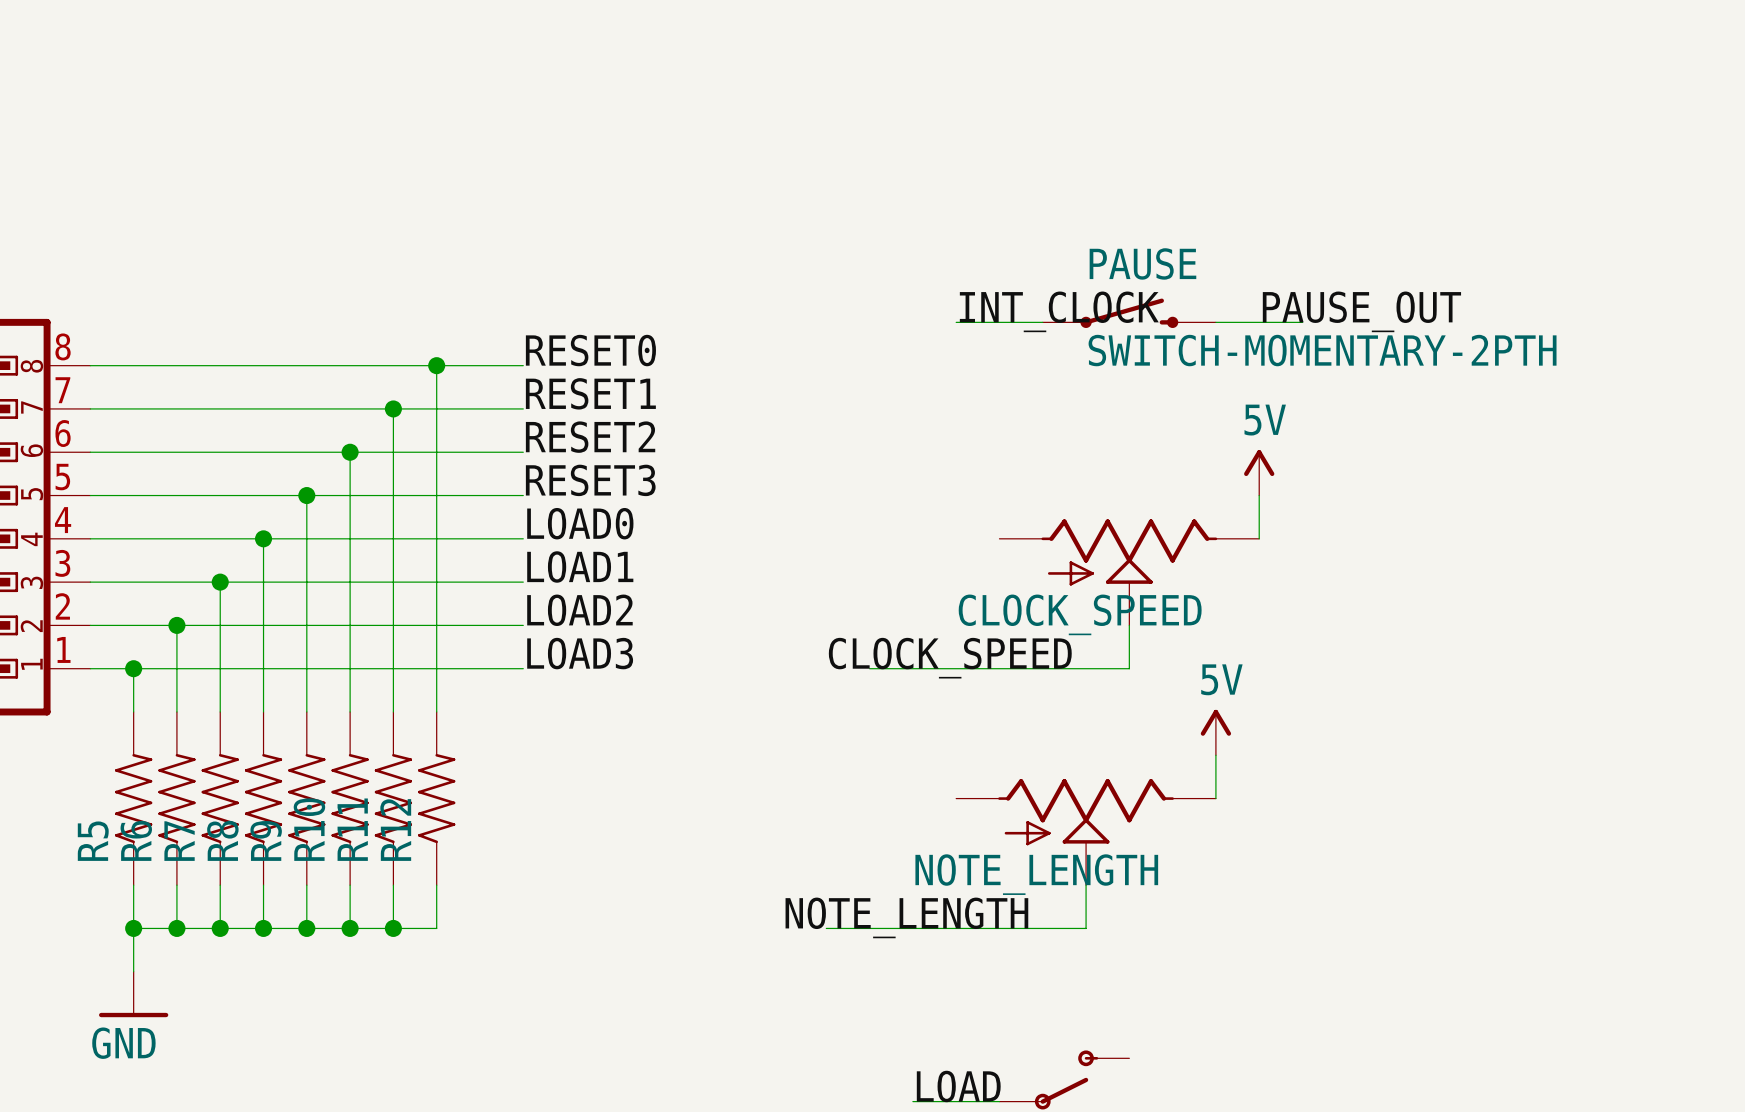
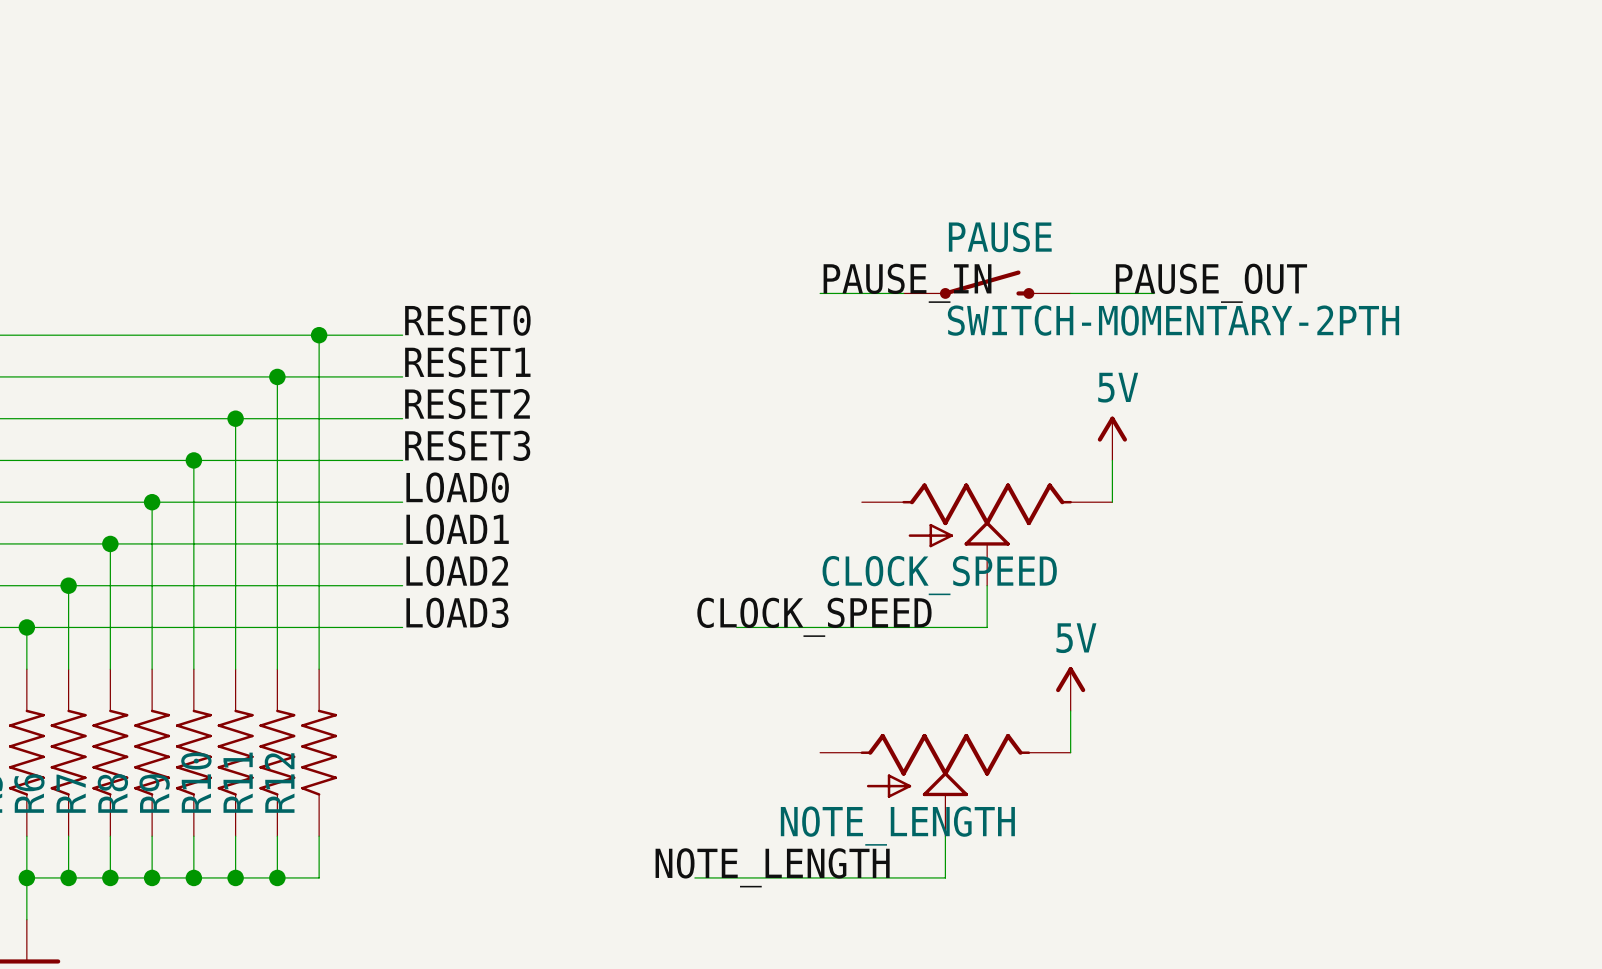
label: INT_CLOCK (1059, 311) -> PAUSE_IN (907, 283)

